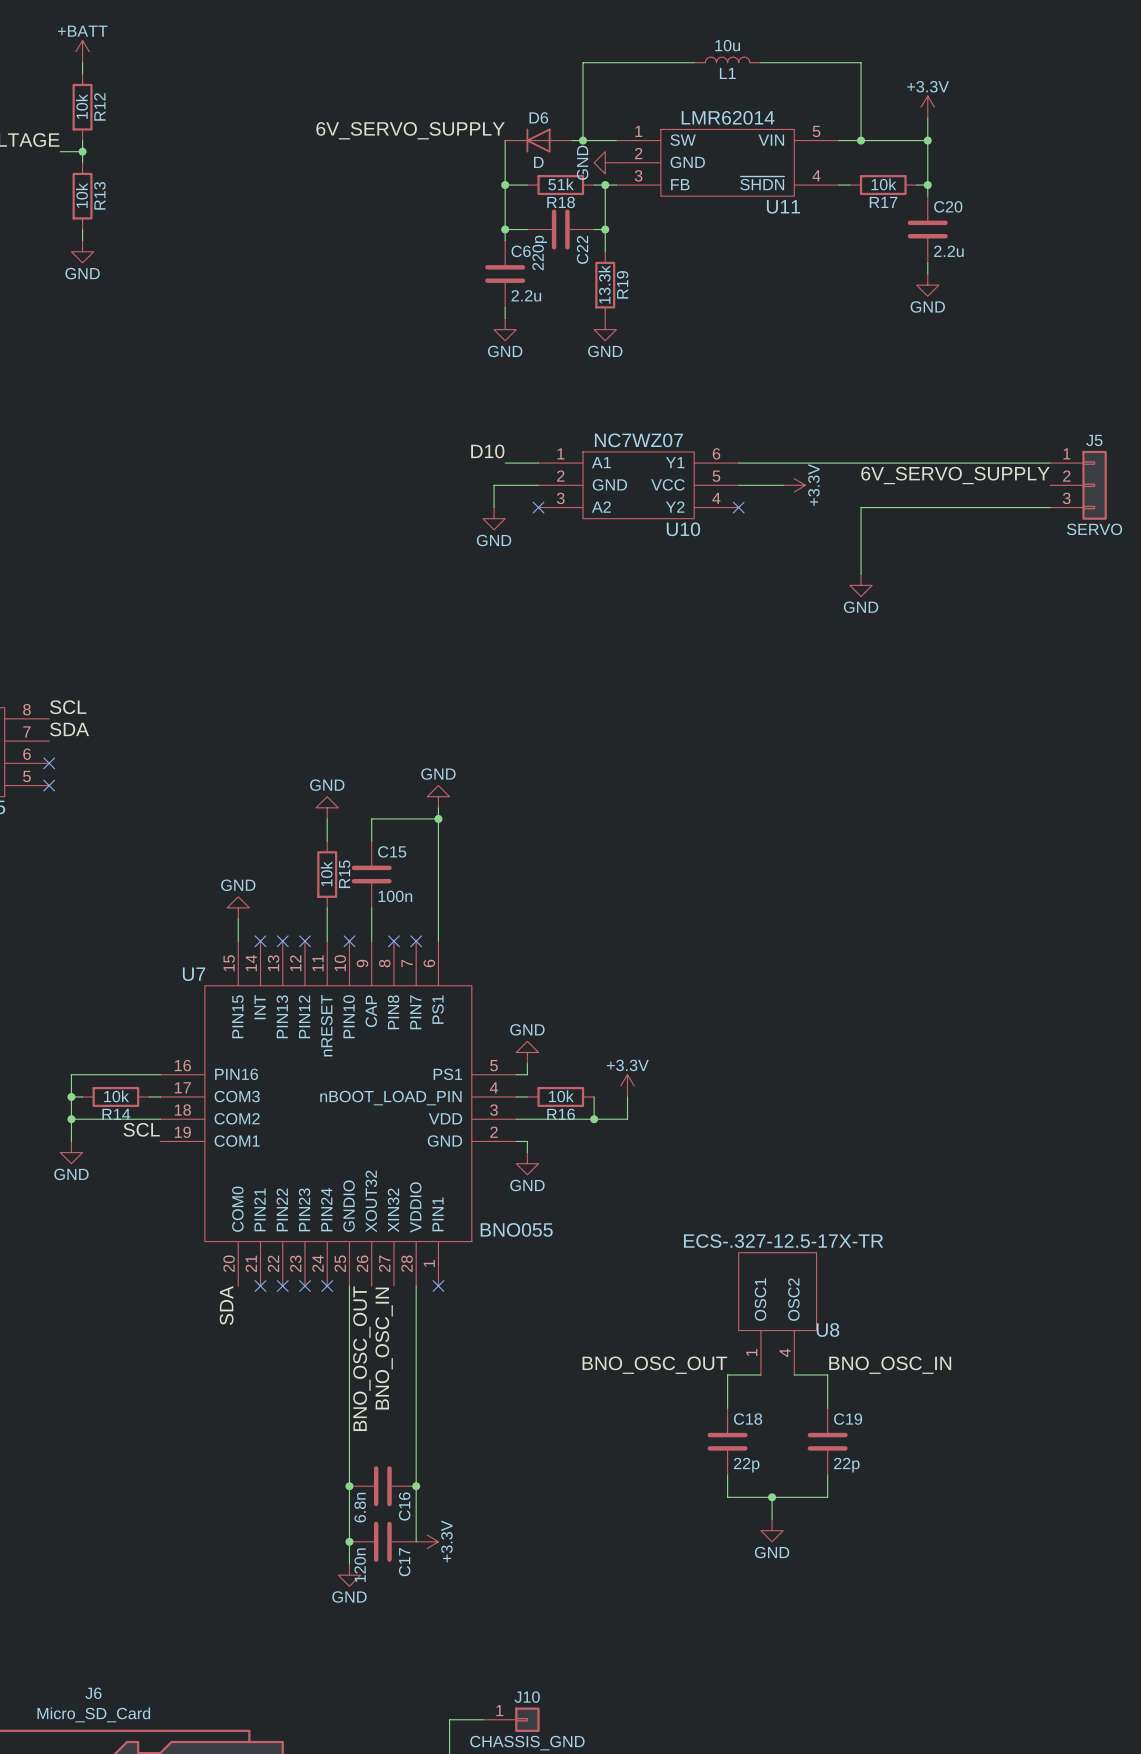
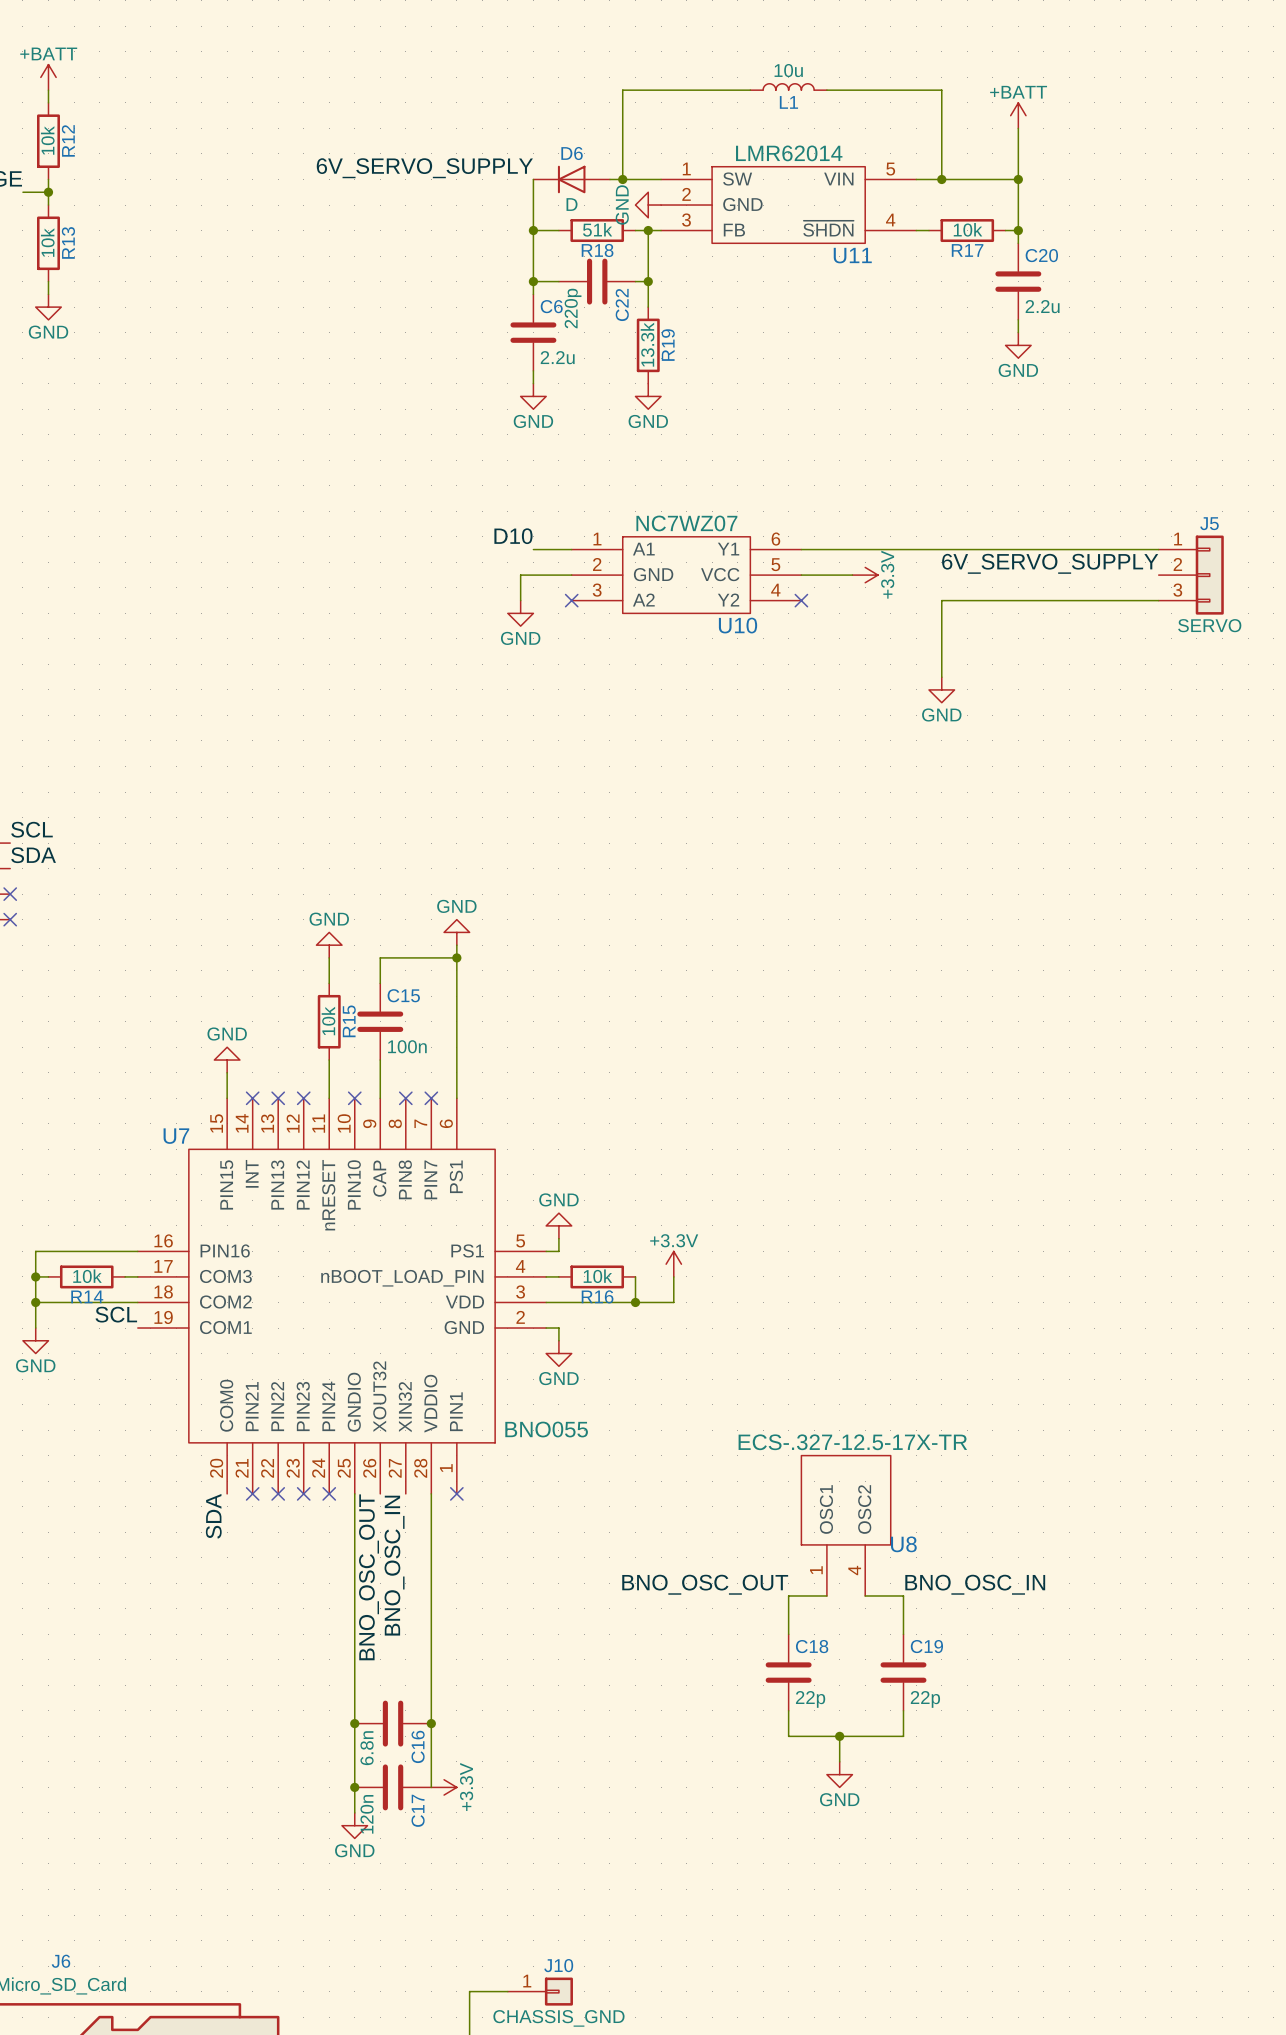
power symbol: none -> +BATT (1018, 115)
power symbol: +3.3V (927, 107) -> none

